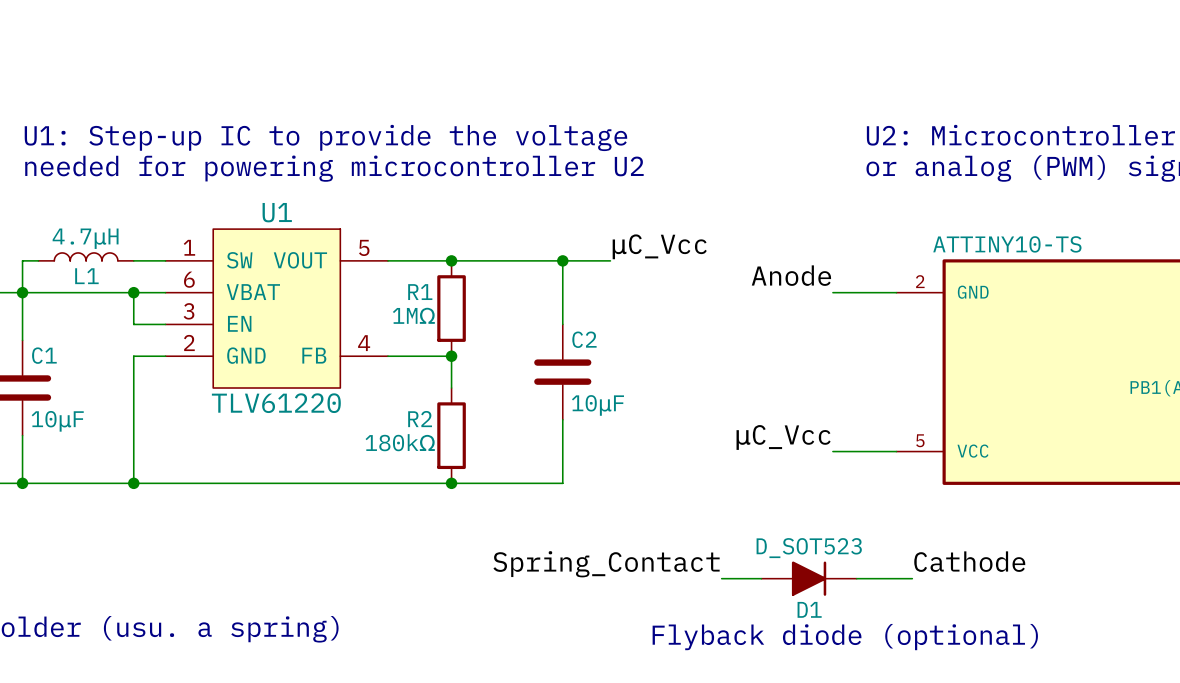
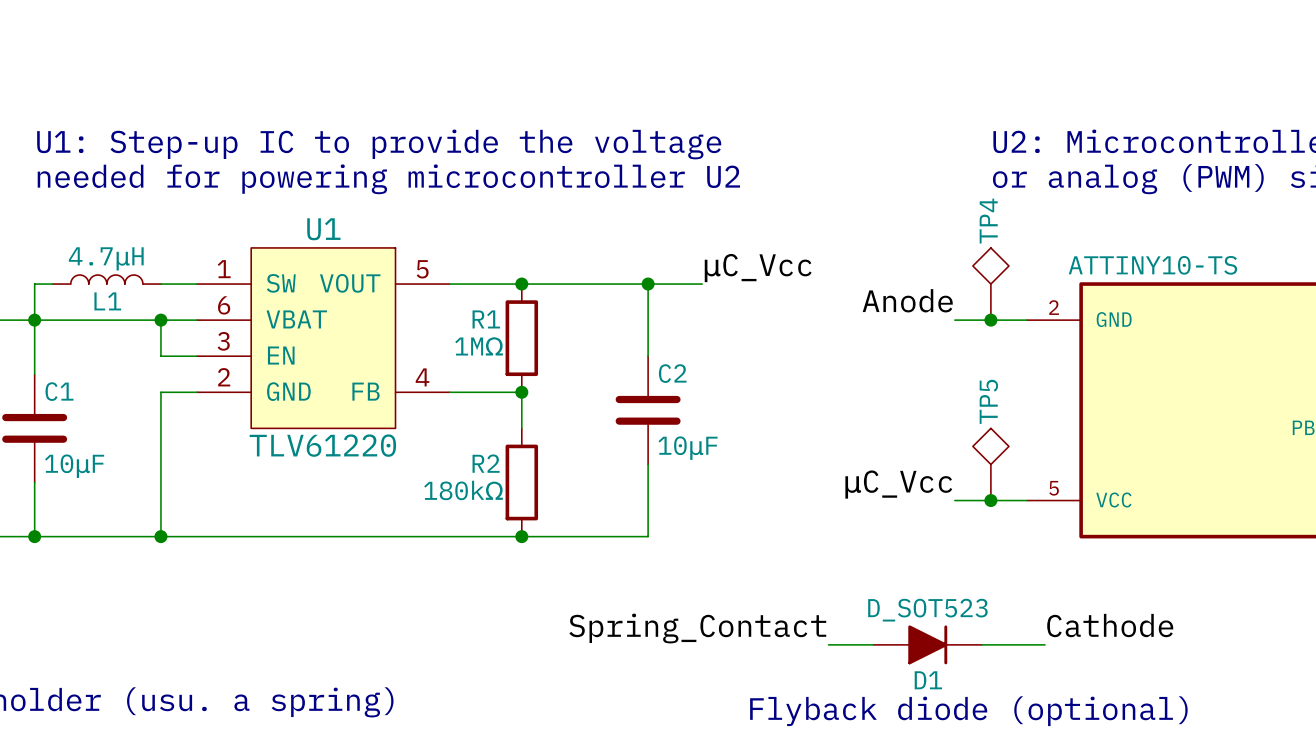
TP4: none -> (990, 284)
junction: none -> (990, 320)
TP5: none -> (990, 464)
junction: none -> (990, 500)

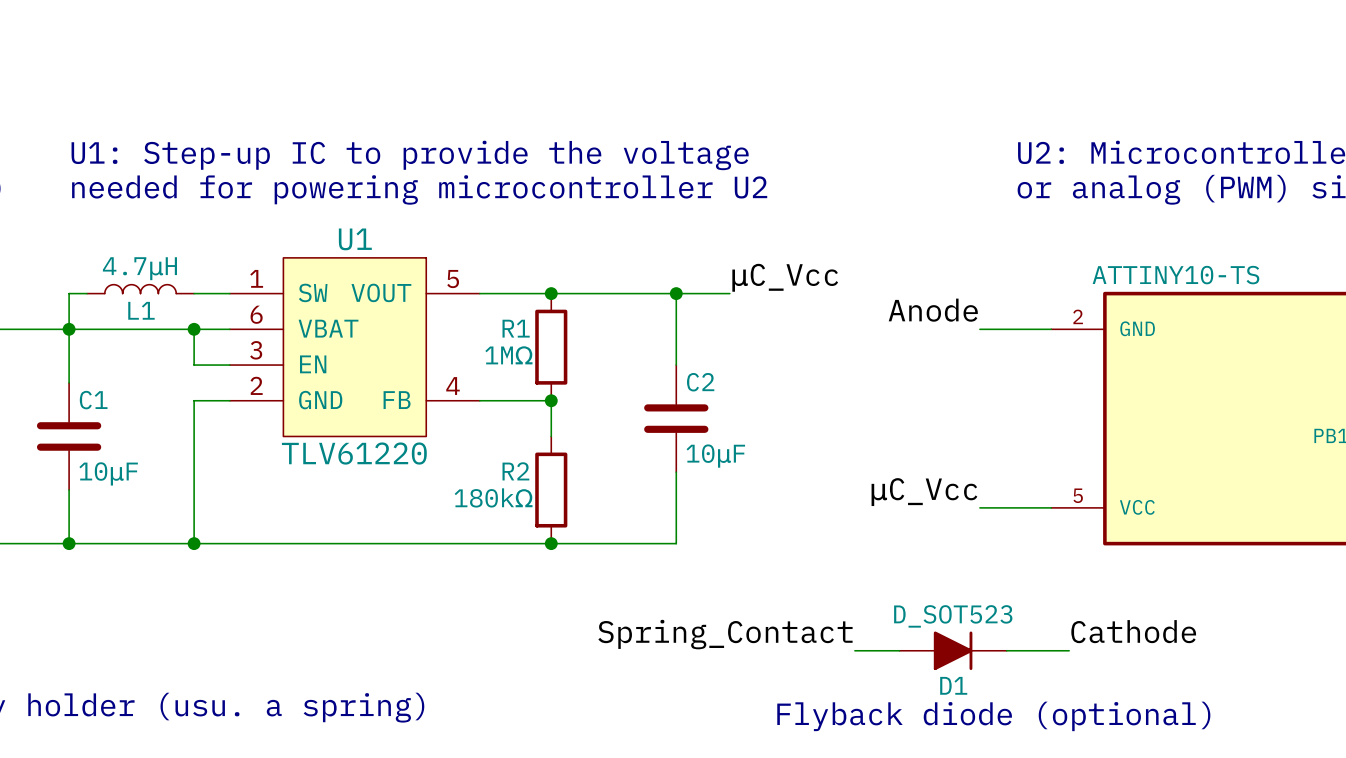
TP4: (990, 284) -> none
junction: (990, 320) -> none
TP5: (990, 464) -> none
junction: (990, 500) -> none

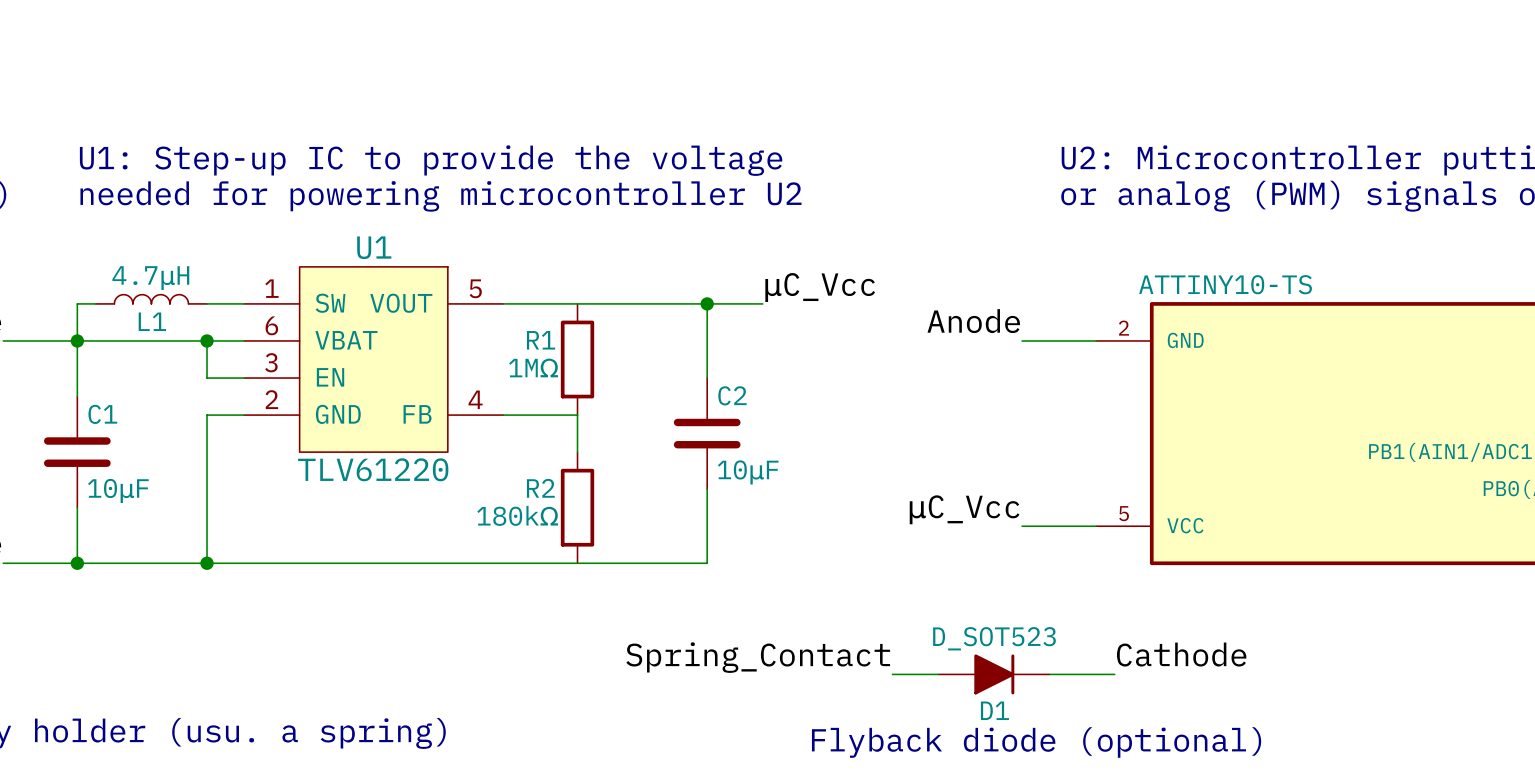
junction: (551, 293) -> none
junction: (551, 400) -> none
junction: (551, 543) -> none

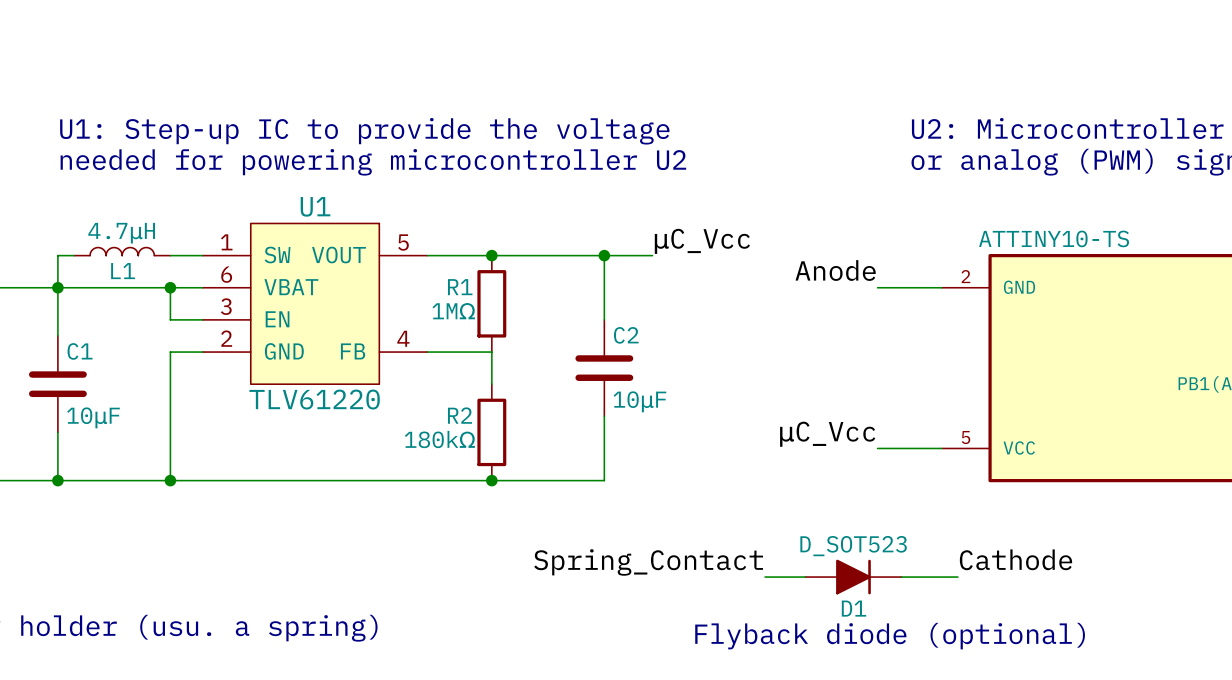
junction: none -> (491, 255)
junction: none -> (491, 480)

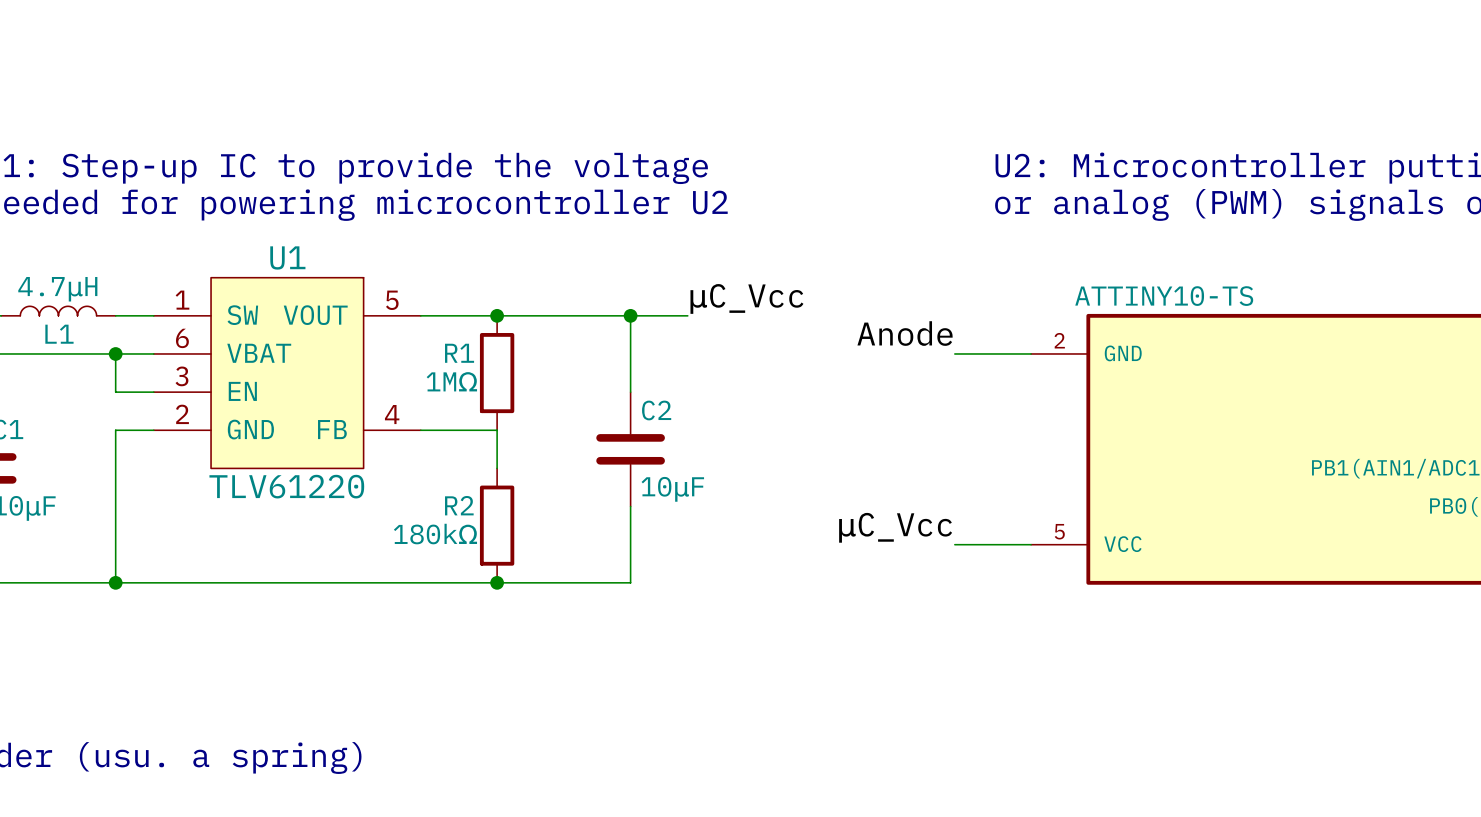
label: Cathode (1015, 559) -> none
label: Spring_Contact (648, 562) -> none
wire: (765, 577) (805, 577) -> none
D1: D_SOT523 (853, 577) -> none
wire: (901, 577) (957, 577) -> none
text: Flyback diode (optional) (890, 636) -> none

